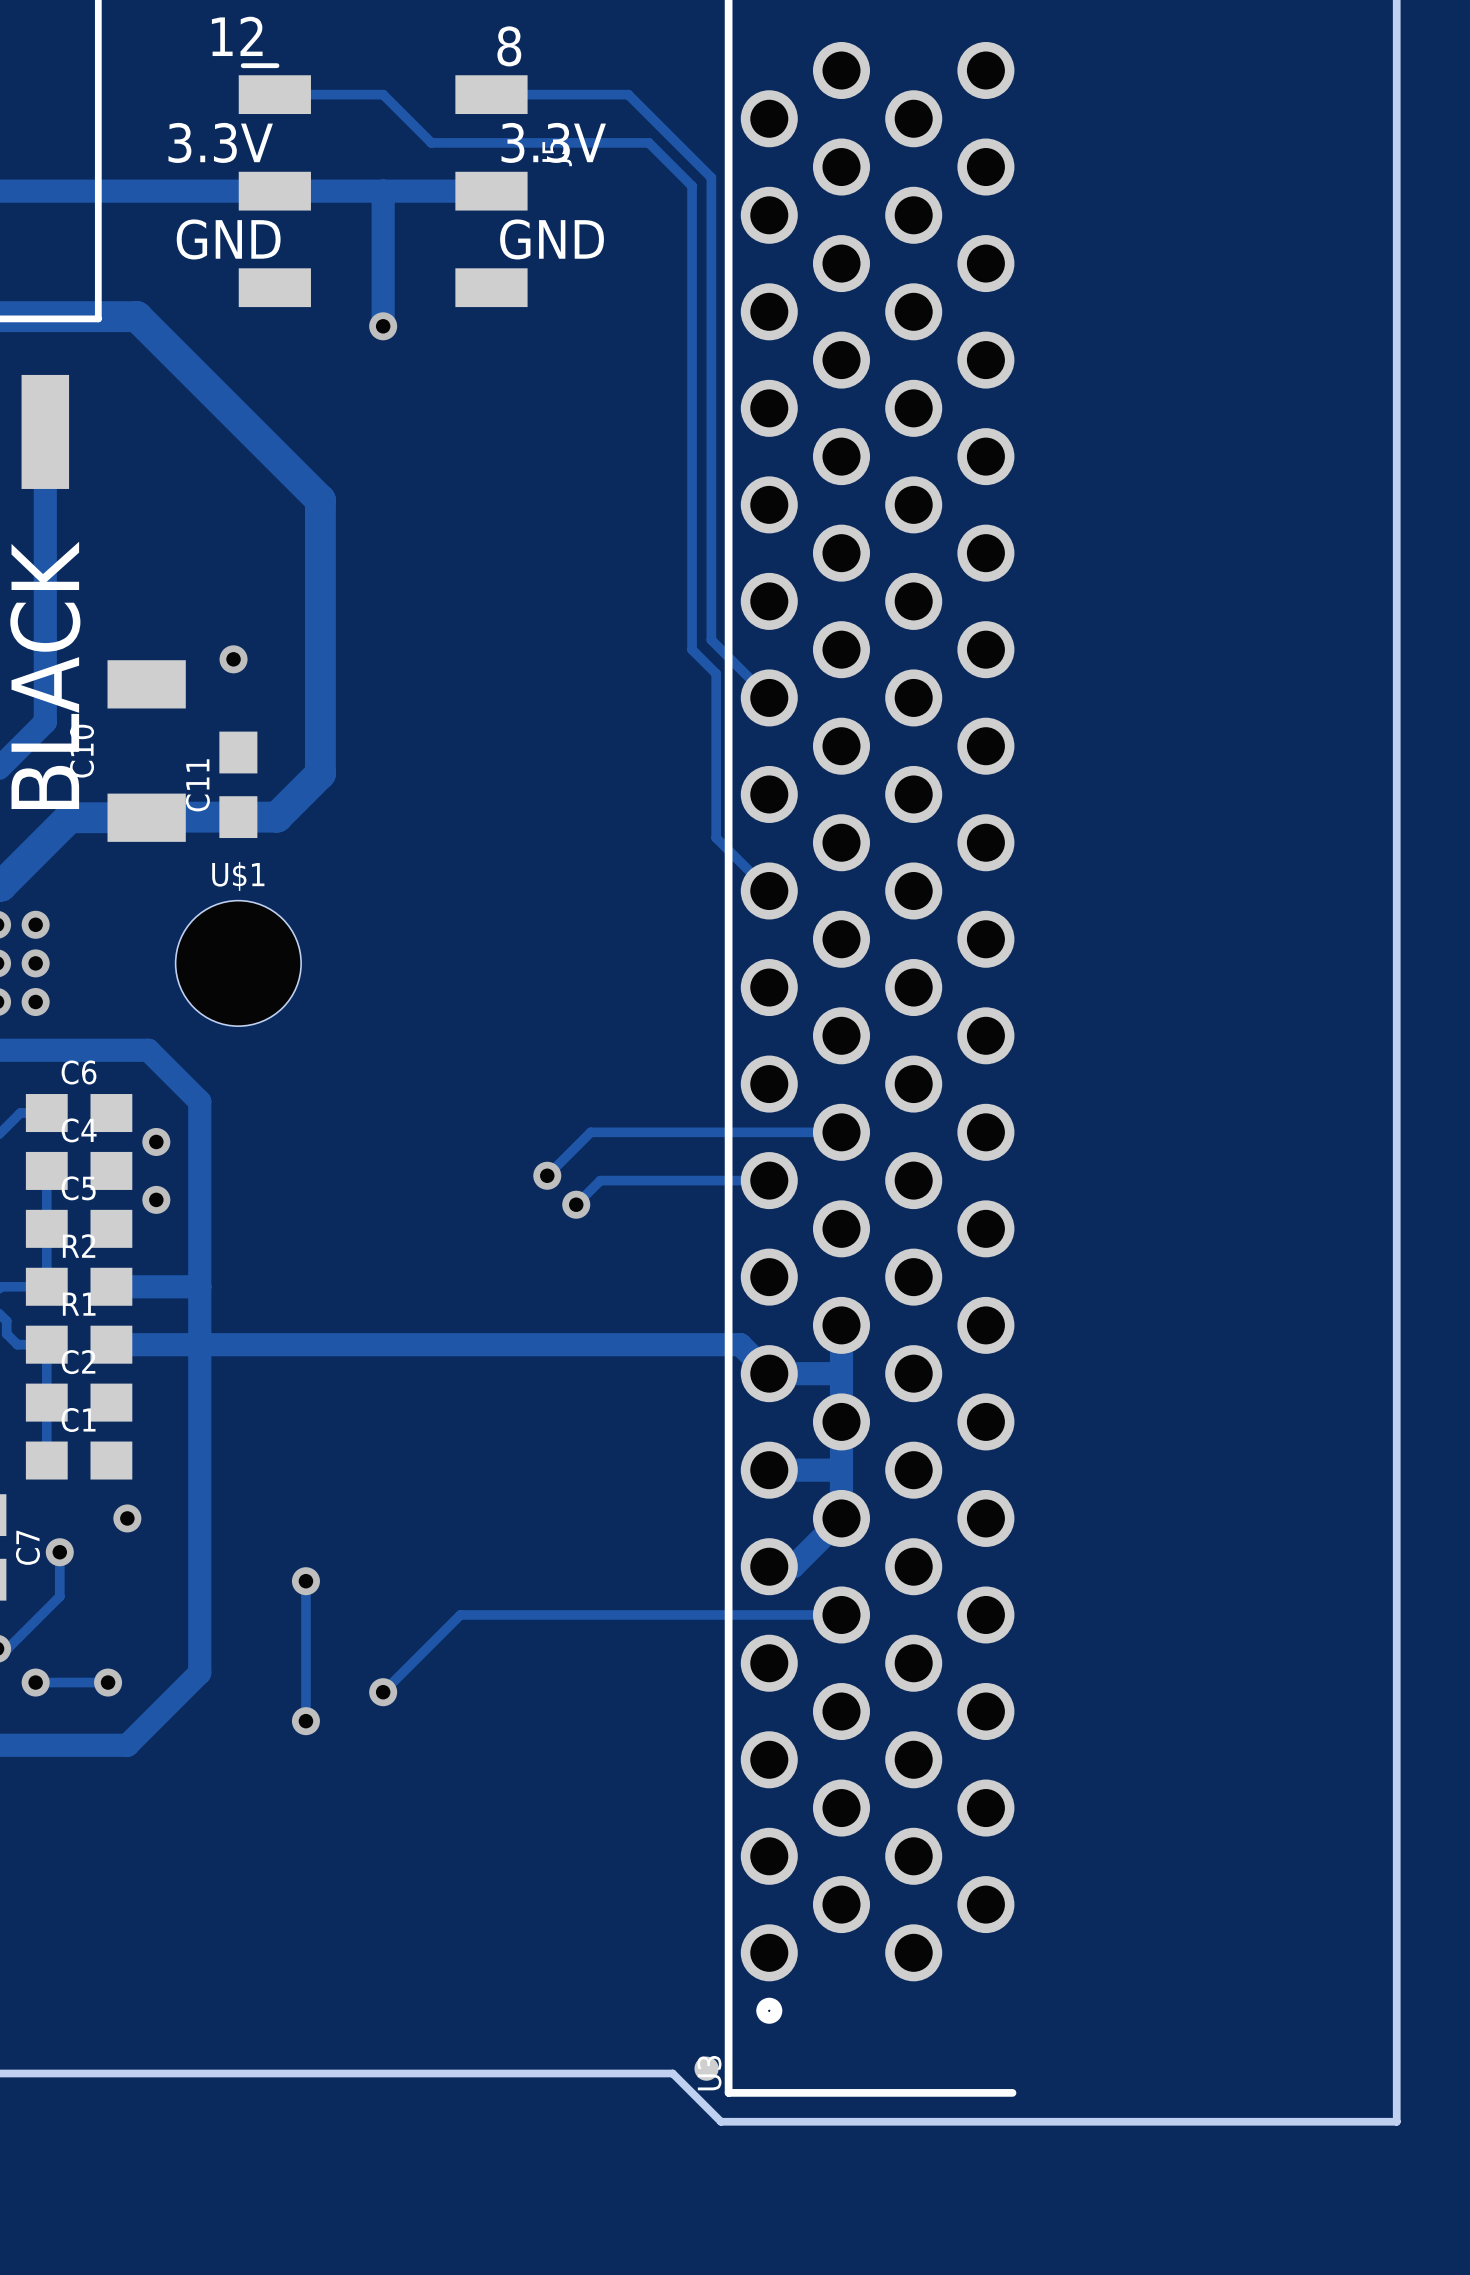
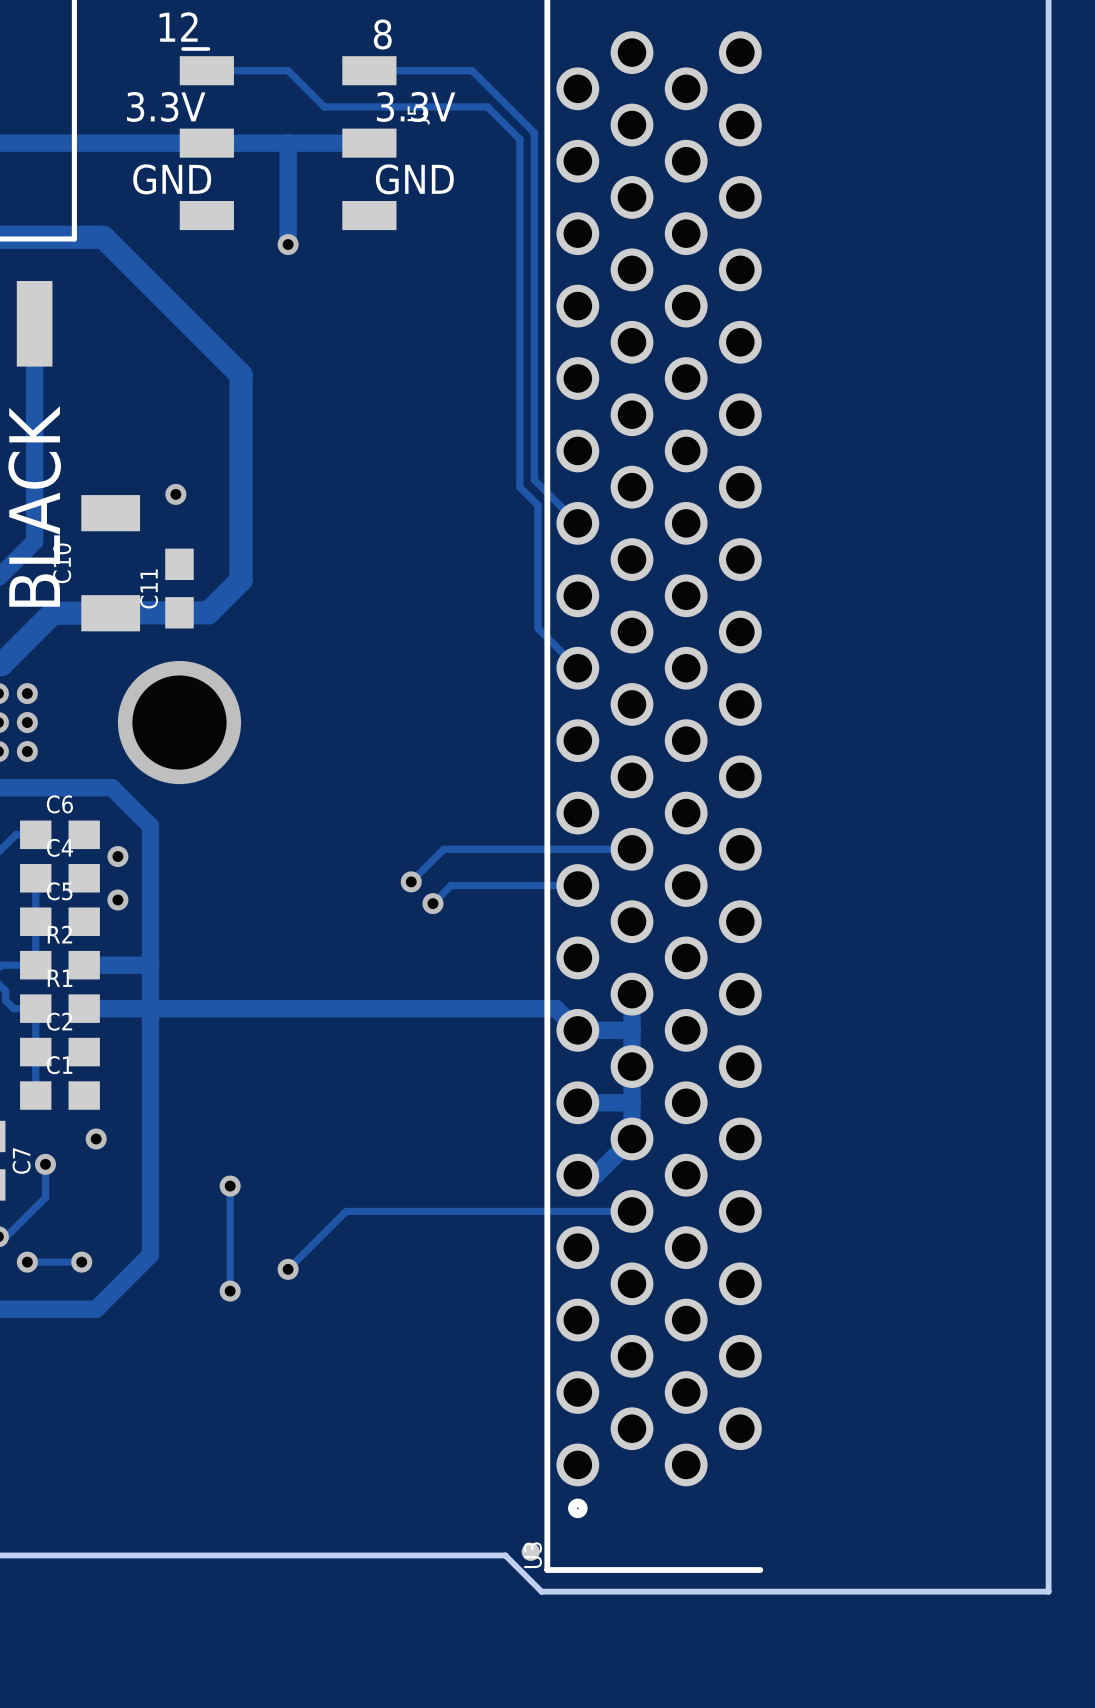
U$1: (238, 963) -> none
via: none -> (179, 722)

